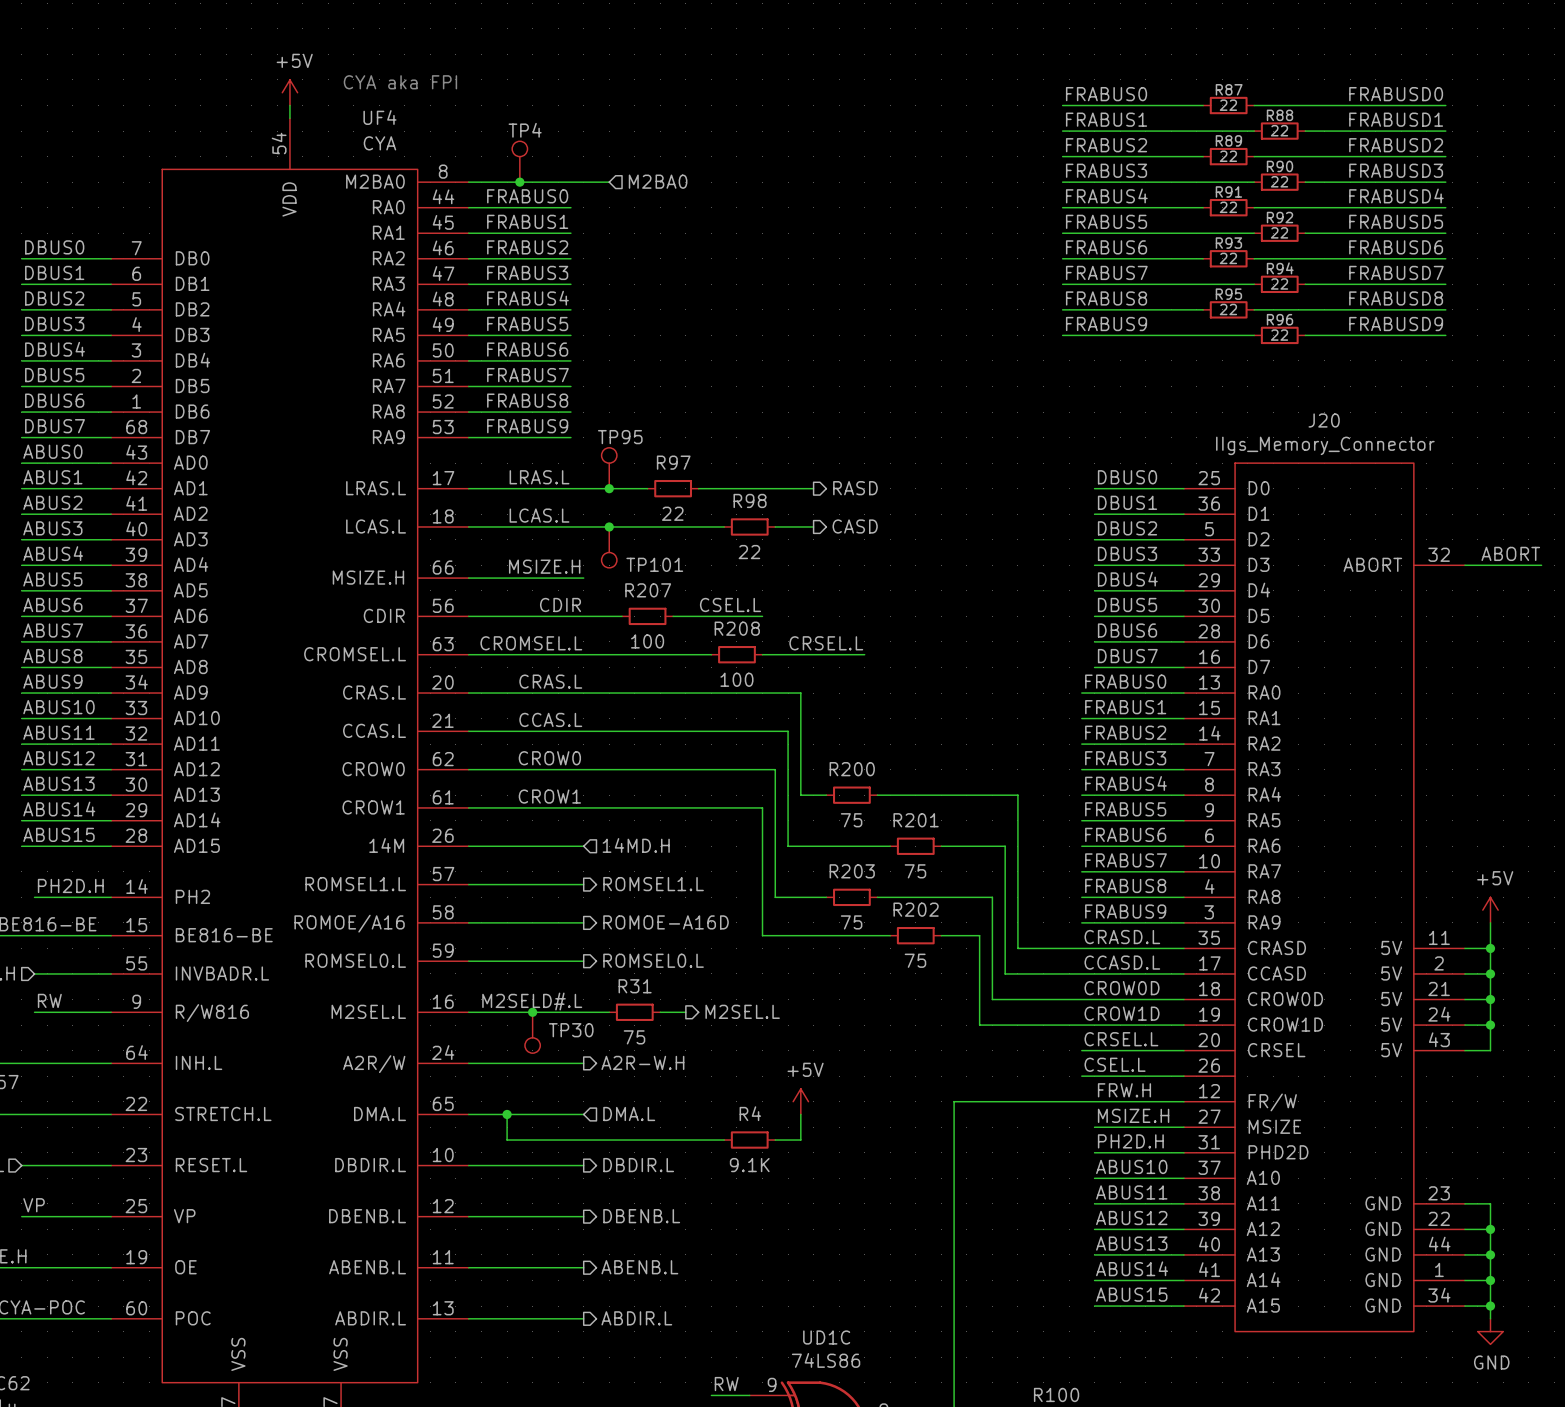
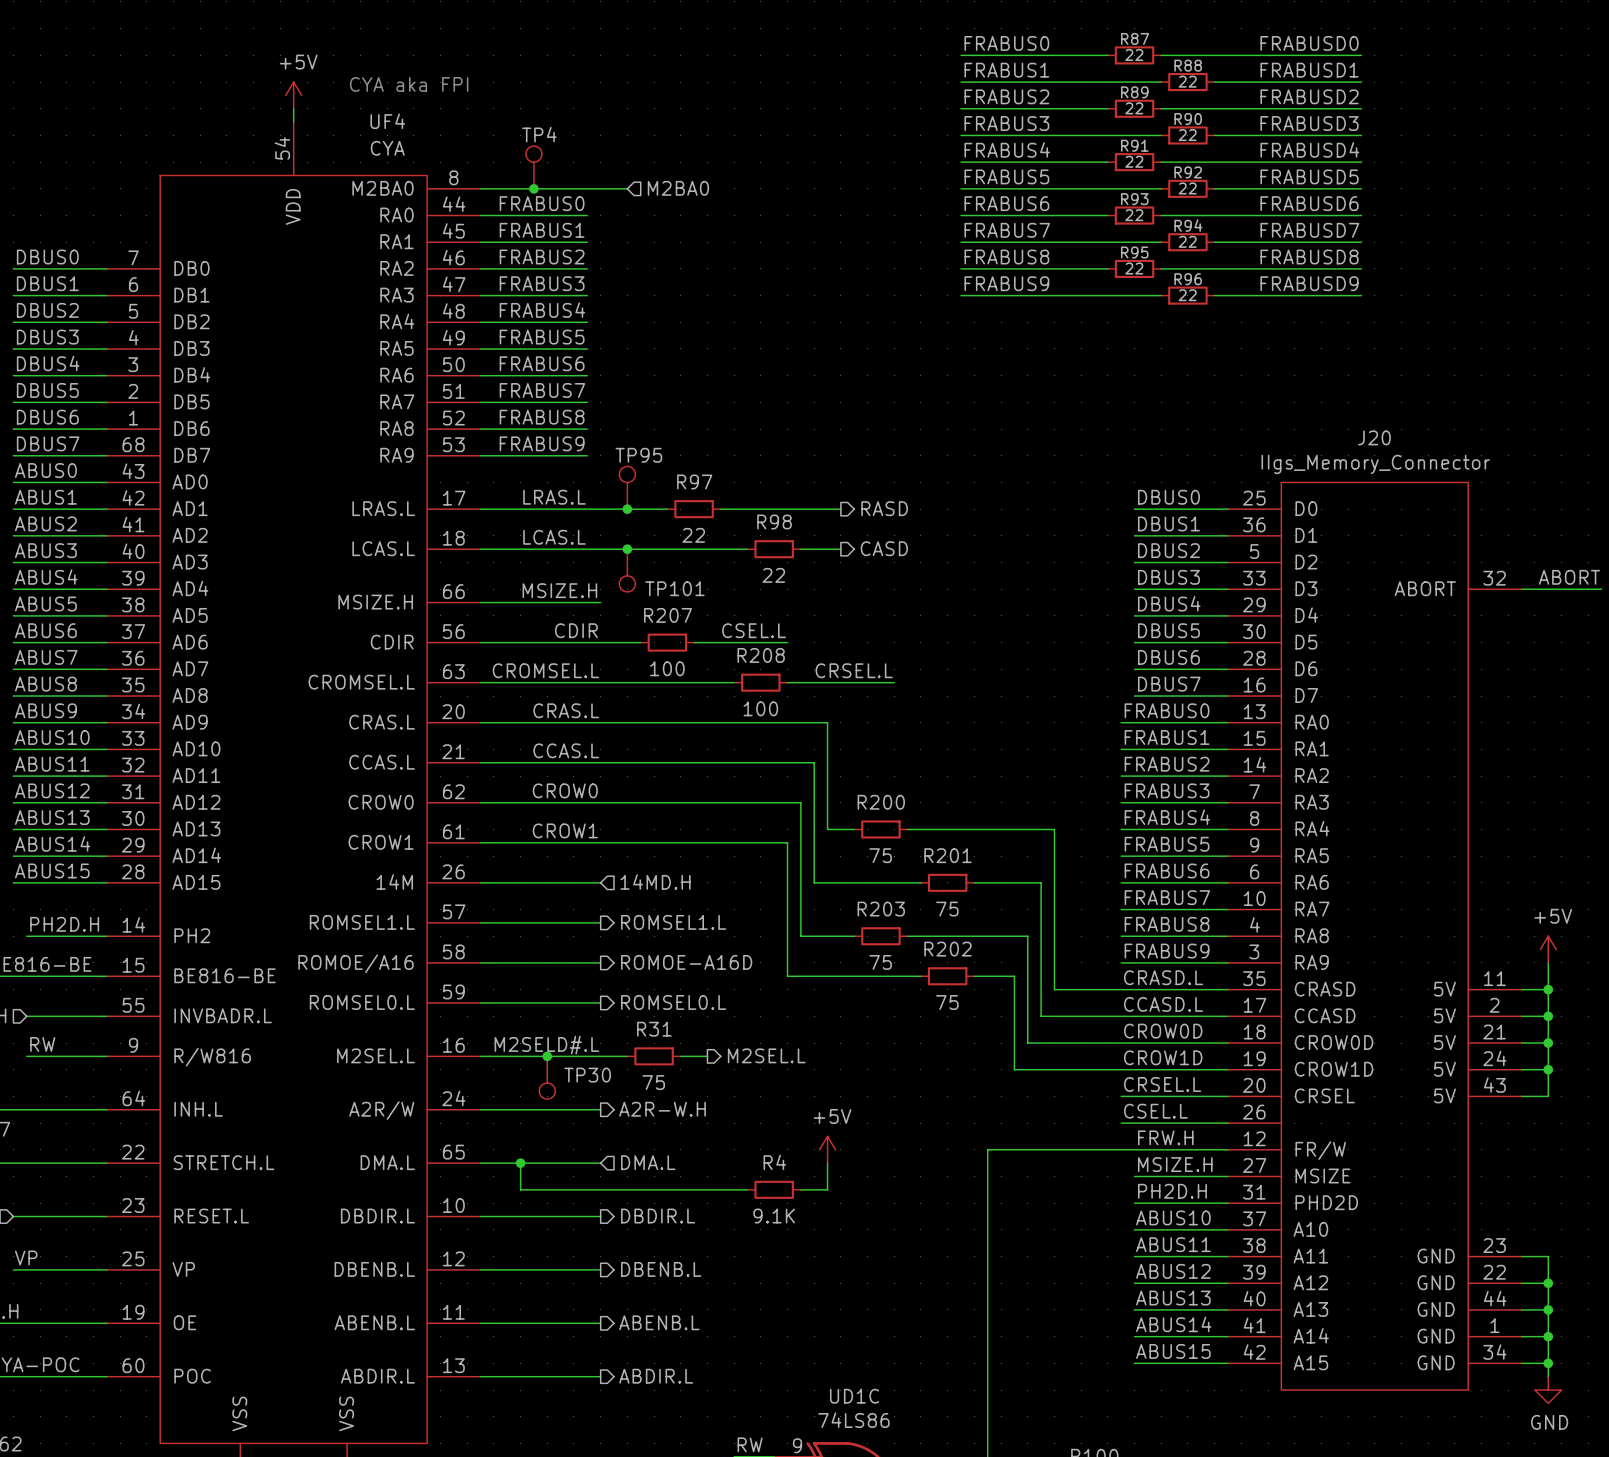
wire: none -> (961, 55) (1107, 55)
wire: none -> (1161, 55) (1361, 55)
wire: none -> (961, 82) (1161, 82)
wire: none -> (1214, 82) (1361, 82)
label position: FRABUS0 (1106, 94) -> FRABUS0 (1006, 43)
label position: FRABUSD0 (1396, 94) -> FRABUSD0 (1309, 43)
wire: none -> (961, 108) (1101, 108)
wire: (1069, 105) (1120, 105) -> (1247, 108) (1301, 108)
R87 position: (1228, 105) -> (1134, 55)
wire: (1311, 105) (1445, 105) -> none
label position: FRABUS1 (1106, 119) -> FRABUS1 (1006, 70)
label position: FRABUSD1 (1396, 119) -> FRABUSD1 (1309, 70)
wire: none -> (961, 135) (1101, 135)
wire: (1120, 131) (1171, 131) -> (1301, 135) (1354, 135)
R88 position: (1279, 131) -> (1187, 82)
wire: (1311, 131) (1445, 131) -> none
label position: FRABUS2 (1106, 145) -> FRABUS2 (1006, 96)
label position: FRABUSD2 (1396, 145) -> FRABUSD2 (1309, 96)
wire: none -> (961, 162) (1101, 162)
wire: (1069, 156) (1120, 156) -> (1247, 162) (1301, 162)
R89 position: (1228, 156) -> (1134, 108)
wire: (1311, 156) (1445, 156) -> none
label position: FRABUS3 (1106, 170) -> FRABUS3 (1006, 123)
label position: FRABUSD3 (1396, 170) -> FRABUSD3 (1309, 123)
wire: none -> (961, 188) (1101, 188)
wire: (1120, 182) (1171, 182) -> (1301, 188) (1354, 188)
R90 position: (1279, 182) -> (1187, 135)
wire: (1311, 182) (1445, 182) -> none
label position: FRABUS4 (1106, 195) -> FRABUS4 (1007, 149)
label position: FRABUSD4 (1396, 195) -> FRABUSD4 (1309, 149)
wire: none -> (961, 215) (1101, 215)
wire: (1069, 207) (1120, 207) -> (1247, 215) (1301, 215)
R91 position: (1228, 207) -> (1134, 162)
wire: (1311, 207) (1445, 207) -> none
label position: FRABUS5 (1106, 221) -> FRABUS5 (1006, 176)
label position: FRABUSD5 (1396, 221) -> FRABUSD5 (1309, 176)
wire: none -> (961, 242) (1101, 242)
wire: (1120, 233) (1171, 233) -> (1301, 242) (1354, 242)
R92 position: (1279, 233) -> (1187, 188)
wire: (1311, 233) (1445, 233) -> none
label position: FRABUS6 (1106, 247) -> FRABUS6 (1006, 203)
label position: FRABUSD6 (1396, 247) -> FRABUSD6 (1309, 203)
wire: none -> (961, 268) (1101, 268)
wire: (1069, 258) (1120, 258) -> (1247, 268) (1301, 268)
R93 position: (1228, 258) -> (1134, 215)
wire: (1311, 258) (1445, 258) -> none
label position: FRABUS7 (1106, 272) -> FRABUS7 (1007, 230)
label position: FRABUSD7 (1396, 272) -> FRABUSD7 (1309, 230)
wire: none -> (961, 295) (1101, 295)
wire: (1120, 284) (1171, 284) -> (1301, 295) (1354, 295)
R94 position: (1279, 284) -> (1187, 242)
wire: (1311, 284) (1445, 284) -> none
label position: FRABUS8 (1106, 298) -> FRABUS8 (1006, 257)
label position: FRABUSD8 (1396, 298) -> FRABUSD8 (1309, 257)
wire: (1062, 309) (1203, 309) -> none
R95 position: (1228, 309) -> (1134, 268)
wire: (1254, 309) (1445, 309) -> none
label position: FRABUS9 (1106, 324) -> FRABUS9 (1006, 283)
label position: FRABUSD9 (1396, 324) -> FRABUSD9 (1309, 283)
wire: (1062, 335) (1254, 335) -> none
R96 position: (1279, 335) -> (1187, 295)
wire: (1305, 335) (1445, 335) -> none

